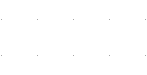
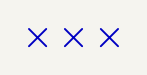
no-connect mark: none -> (37, 37)
no-connect mark: none -> (73, 37)
no-connect mark: none -> (109, 37)

